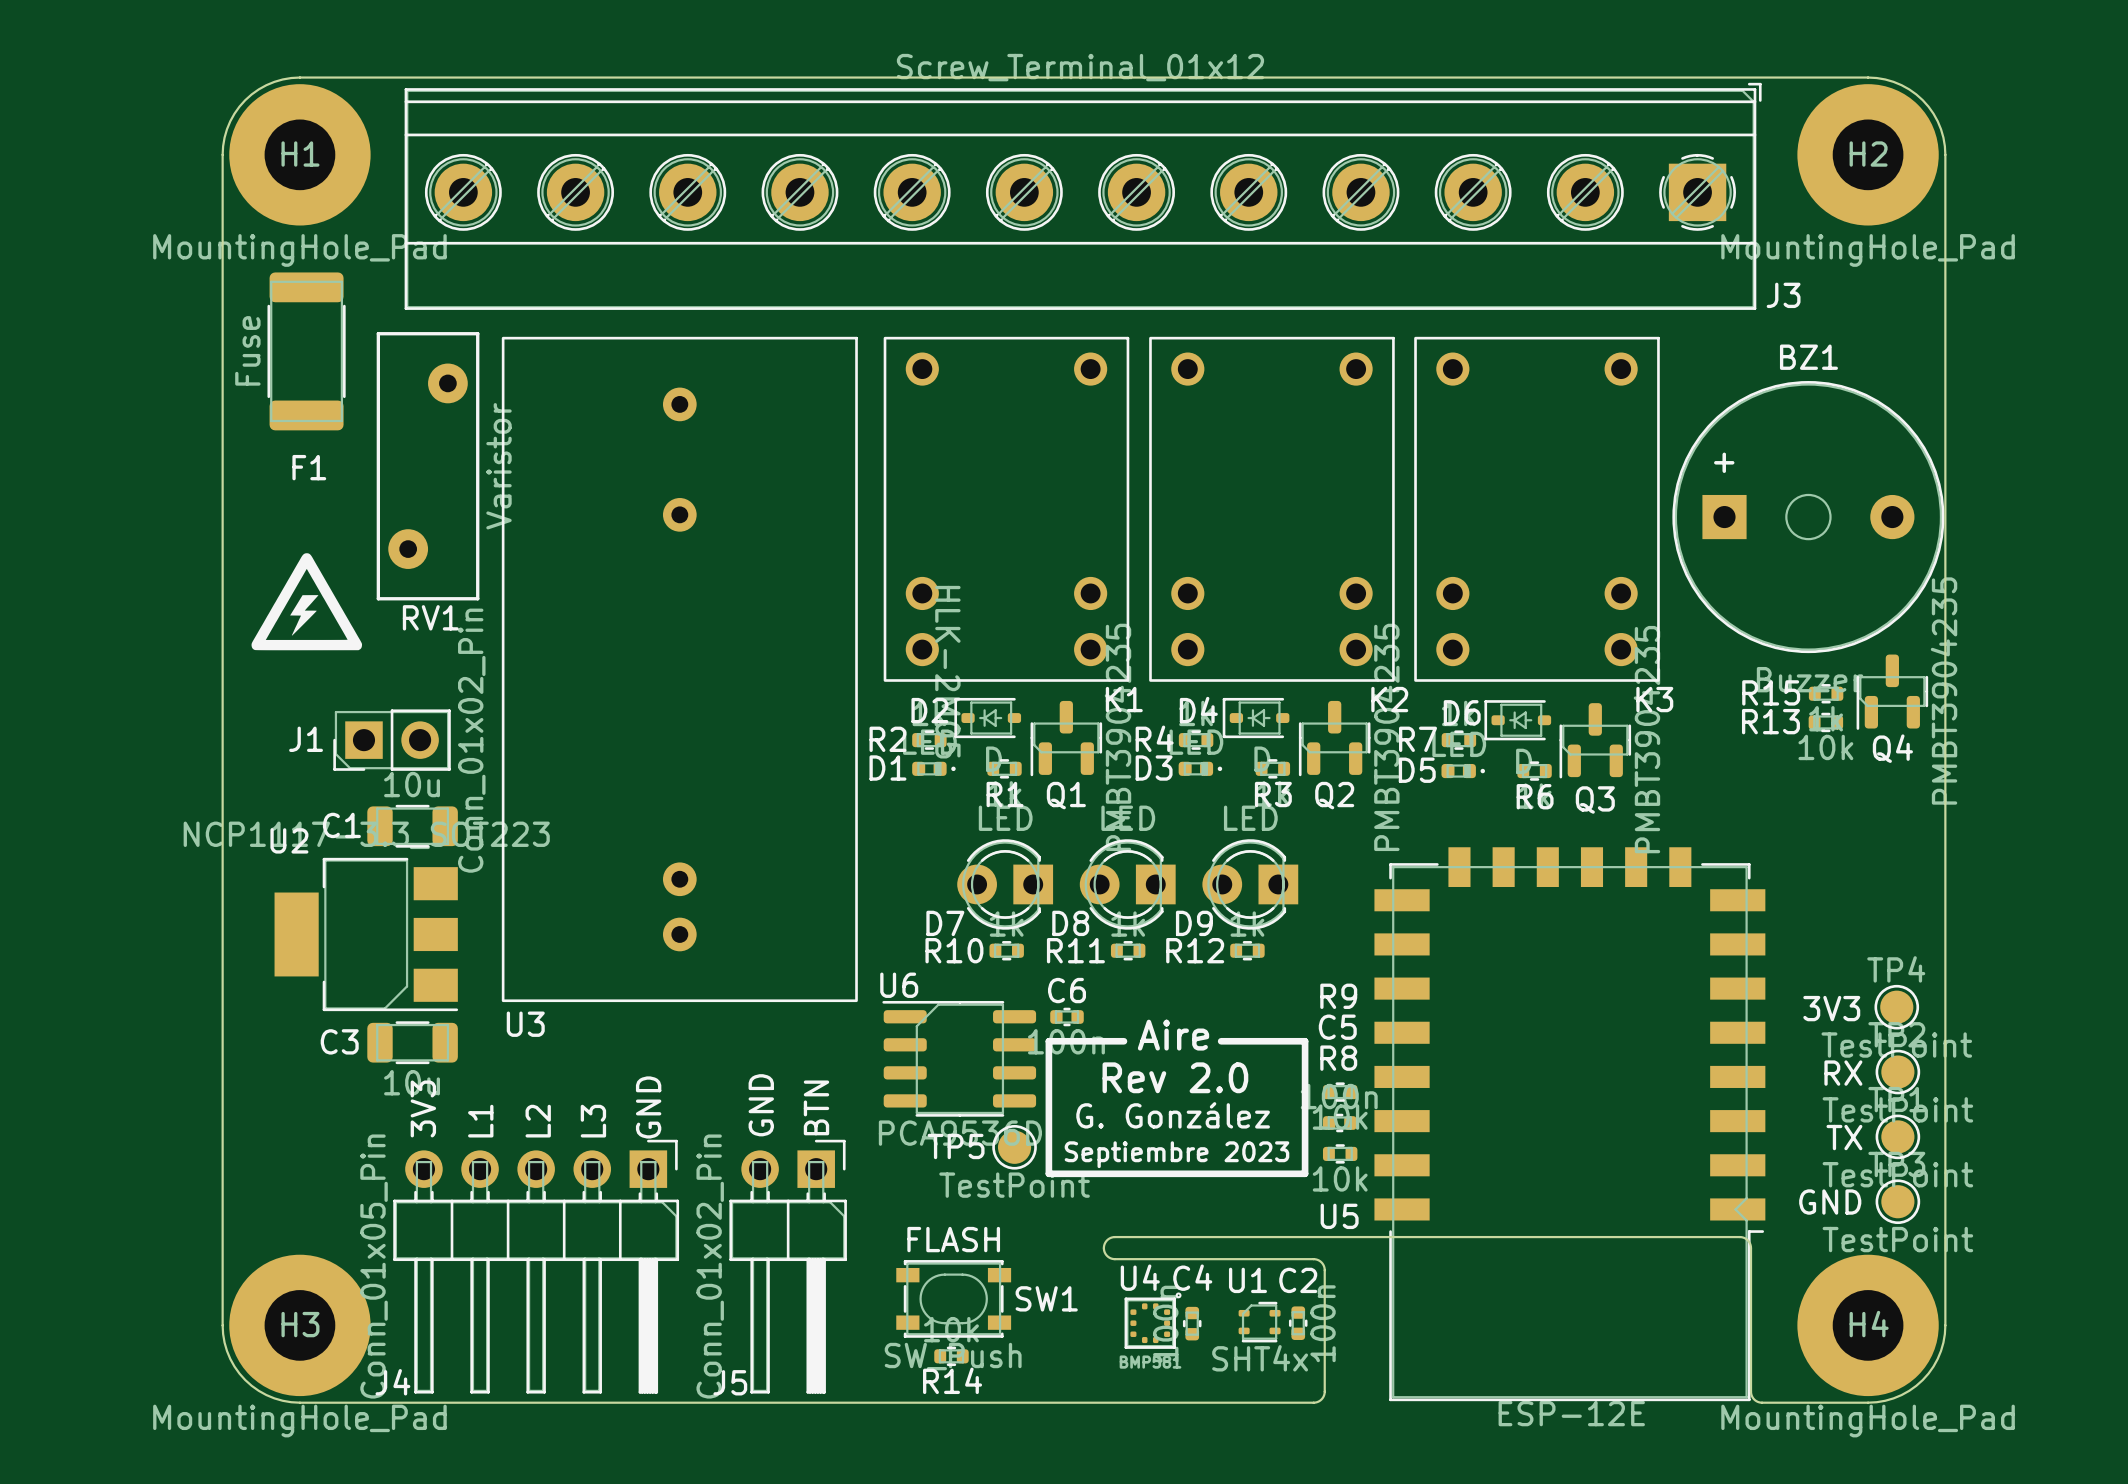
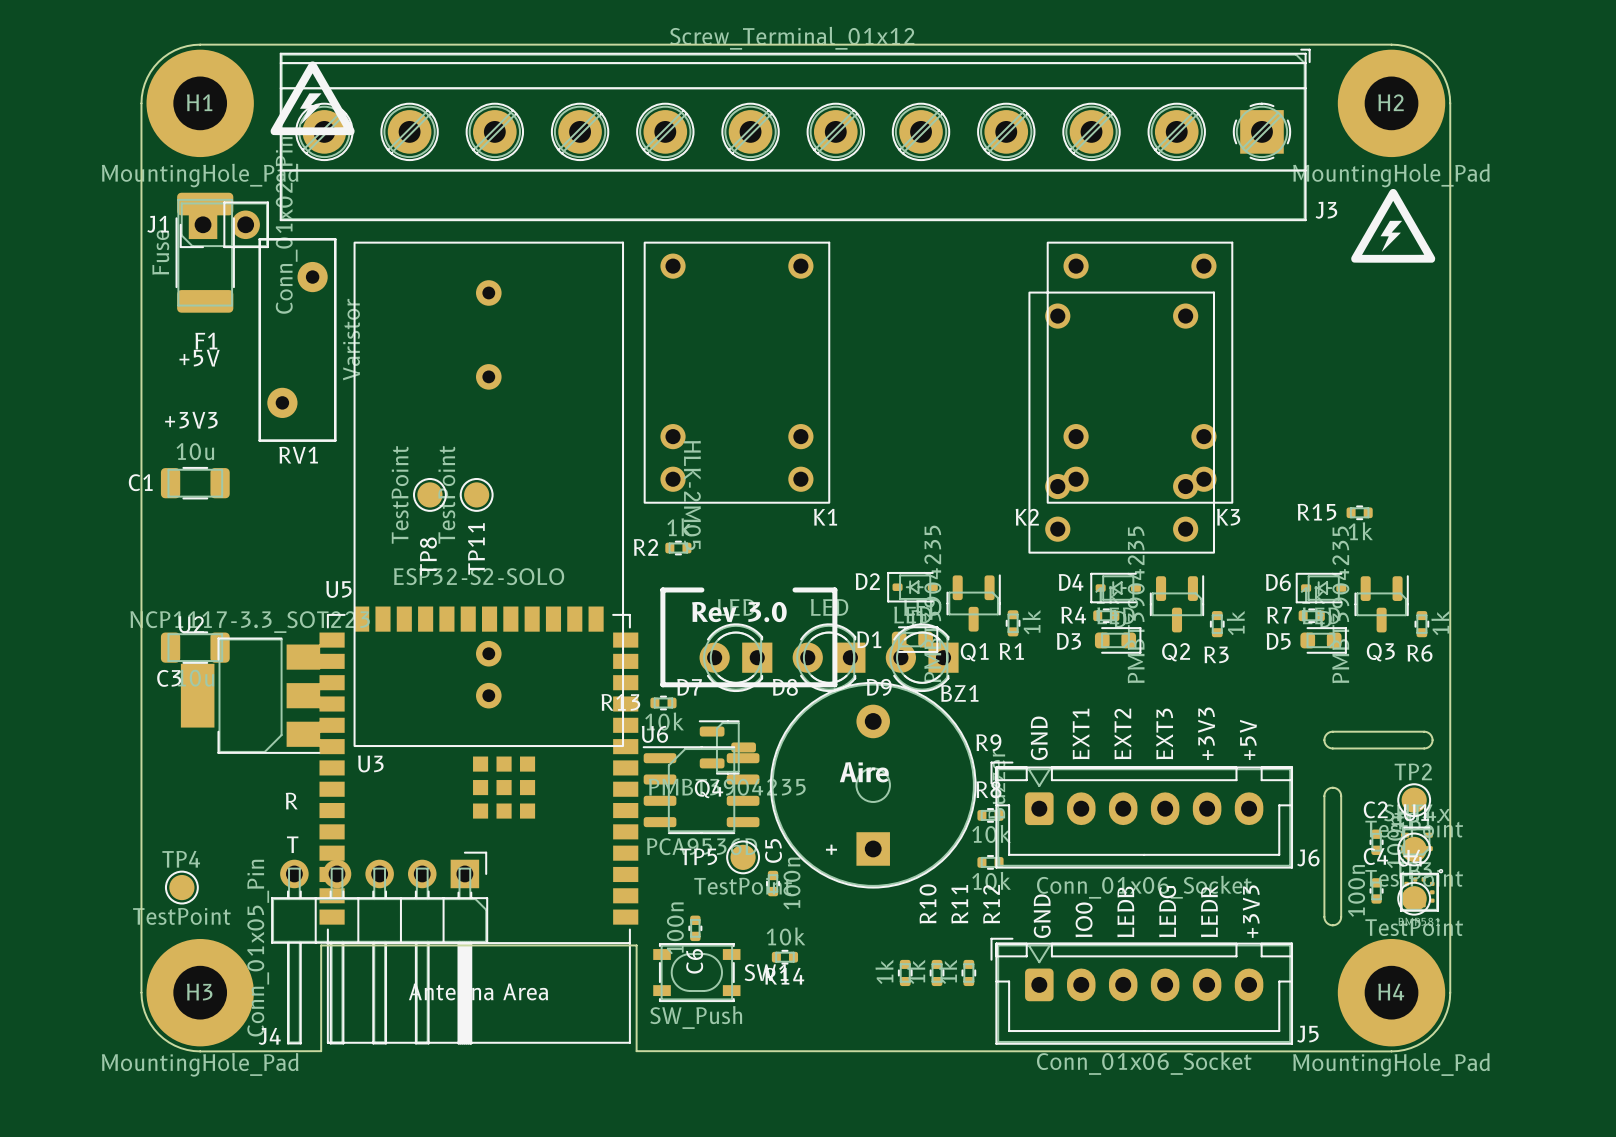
drawing: none -> [1351, 188, 1436, 263]
BZ1 name position: BZ1 (1808, 357) -> BZ1 (959, 693)
text: none -> +5V (199, 358)
K2 position: (1271, 509) -> (1121, 422)
BZ1 rotation: 0° (1808, 517) -> 90° counterclockwise (873, 785)
BZ1 position: (1808, 517) -> (873, 785)
text: none -> +3V3 (191, 420)
drawing position: (306, 601) -> (312, 98)
TP8: none -> TestPoint (429, 494)
TP11: none -> TestPoint (476, 494)
Q4 rotation: 0° (1892, 692) -> 90° clockwise (727, 747)
Q4 position: (1892, 692) -> (727, 747)
D2 position: (987, 718) -> (912, 587)
D4 position: (1256, 718) -> (1115, 588)
D6 position: (1517, 720) -> (1321, 588)
R13 position: (1825, 722) -> (663, 702)
Q1 rotation: 0° (1066, 738) -> 180° (973, 602)
Q1 position: (1066, 738) -> (973, 602)
Q2 rotation: 0° (1334, 738) -> 180° (1176, 603)
Q2 position: (1334, 738) -> (1176, 603)
J1 position: (392, 740) -> (224, 224)
R4 position: (1196, 740) -> (1106, 615)
R7 position: (1458, 740) -> (1311, 615)
Q3 rotation: 0° (1595, 740) -> 180° (1381, 603)
Q3 position: (1595, 740) -> (1381, 603)
D1 footprint: [912, 761, 956, 776] -> [891, 626, 939, 653]
D3 footprint: [1178, 761, 1223, 776] -> [1094, 627, 1142, 654]
D5 footprint: [1441, 763, 1485, 779] -> [1300, 627, 1347, 654]
R1 rotation: 0° (1004, 768) -> 90° clockwise (1013, 623)
R1 position: (1004, 768) -> (1013, 623)
R3 rotation: 0° (1272, 768) -> 90° clockwise (1217, 624)
R3 position: (1272, 768) -> (1217, 624)
R6 rotation: 0° (1534, 771) -> 90° clockwise (1421, 624)
R6 position: (1534, 771) -> (1421, 624)
line: none -> (701, 589) (662, 589) (662, 684) (834, 684) (834, 589) (795, 589)
text: none -> Rev 3.0 (739, 612)
C1 position: (412, 826) -> (195, 483)
U5 footprint: [1374, 847, 1766, 1402] -> [319, 606, 639, 1044]
R10 name position: R10 (954, 950) -> R10 (928, 903)
R10 rotation: 0° (1006, 950) -> 90° clockwise (905, 972)
R10 position: (1006, 950) -> (905, 972)
R11 name position: R11 (1075, 950) -> R11 (959, 904)
R11 rotation: 0° (1128, 950) -> 90° clockwise (937, 972)
R11 position: (1128, 950) -> (937, 972)
R12 name position: R12 (1195, 950) -> R12 (991, 904)
R12 rotation: 0° (1247, 950) -> 90° clockwise (968, 972)
R12 position: (1247, 950) -> (968, 972)
text: none -> +3V3 (1206, 733)
text: none -> EXT1 (1080, 734)
text: none -> EXT2 (1122, 733)
text: none -> EXT3 (1164, 733)
board edge: none -> (1332, 731) (1425, 731) (1430, 734) (1432, 741) (1430, 746) (1425, 748) (1331, 748) (1326, 745) (1324, 739) (1327, 733) (1332, 731)
text: none -> +5V (1248, 739)
text: none -> GND (1039, 738)
C6 name position: C6 (1066, 990) -> C6 (694, 961)
TP4 position: (1896, 1007) -> (181, 887)
text: 3V3 (1831, 1008) -> none
C6 rotation: 0° (1066, 1016) -> 90° clockwise (695, 928)
C6 position: (1066, 1016) -> (695, 928)
C5 name position: C5 (1337, 1027) -> C5 (773, 850)
C3 name position: C3 (339, 1041) -> C3 (169, 678)
line: (1123, 1041) (1048, 1041) (1048, 1173) (1305, 1173) (1305, 1041) (1221, 1041) -> none
C3 position: (412, 1042) -> (195, 647)
board edge: none -> (1332, 787) (1338, 790) (1341, 796) (1341, 916) (1338, 922) (1332, 925) (1326, 922) (1324, 916) (1324, 796) (1326, 790) (1332, 787)
text: none -> R (291, 801)
text: RX (1843, 1073) -> none
text: Rev 2.0 (1175, 1077) -> none
J6: none -> Conn_01x06_Socket (1141, 815)
text: GND (761, 1105) -> none
text: GND (648, 1107) -> none
text: BTN (816, 1107) -> none
text: 3V3 (423, 1108) -> none
text: G. González (1173, 1115) -> none
text: L1 (480, 1121) -> none
text: L2 (538, 1121) -> none
text: L3 (593, 1121) -> none
C5 rotation: 0° (1339, 1123) -> 90° clockwise (773, 883)
C5 position: (1339, 1123) -> (773, 883)
text: none -> T (292, 844)
text: TX (1844, 1137) -> none
J5 footprint: [729, 1139, 847, 1394] -> [990, 937, 1294, 1045]
text: Septiembre 2023 (1176, 1154) -> none
text: GND (1830, 1202) -> none
text: none -> +3V3 (1251, 911)
text: none -> LEDB (1125, 911)
text: none -> LEDG (1167, 911)
text: none -> LEDR (1209, 911)
U5 name position: U5 (1339, 1216) -> U5 (338, 589)
text: none -> GND (1042, 916)
text: none -> IO0 (1084, 919)
text: FLASH (953, 1239) -> none
J5 value: Conn_01x02_Pin (710, 1266) -> Conn_01x06_Socket (1144, 1063)
U4 position: (1153, 1320) -> (1421, 890)
U1 rotation: 0° (1259, 1322) -> 180° (1416, 841)
U1 position: (1259, 1322) -> (1416, 841)
C4 position: (1192, 1323) -> (1376, 890)
C2 position: (1298, 1323) -> (1376, 842)
R14 position: (951, 1356) -> (784, 957)
J5 name position: J5 (730, 1382) -> J5 (1307, 1034)
board edge: (299, 1402) (1313, 1402) (1322, 1398) (1324, 1391) (1324, 1270) (1320, 1261) (1313, 1259) (1113, 1259) (1106, 1254) (1103, 1248) (1107, 1240) (1114, 1237) (1742, 1237) (1748, 1241) (1751, 1248) (1751, 1391) (1753, 1398) (1762, 1402) (1868, 1402) -> (200, 1051) (321, 1051) (321, 945) (636, 945) (636, 1051) (1391, 1051)
U5 value: ESP-12E (1571, 1413) -> ESP32-S2-SOLO (479, 576)

